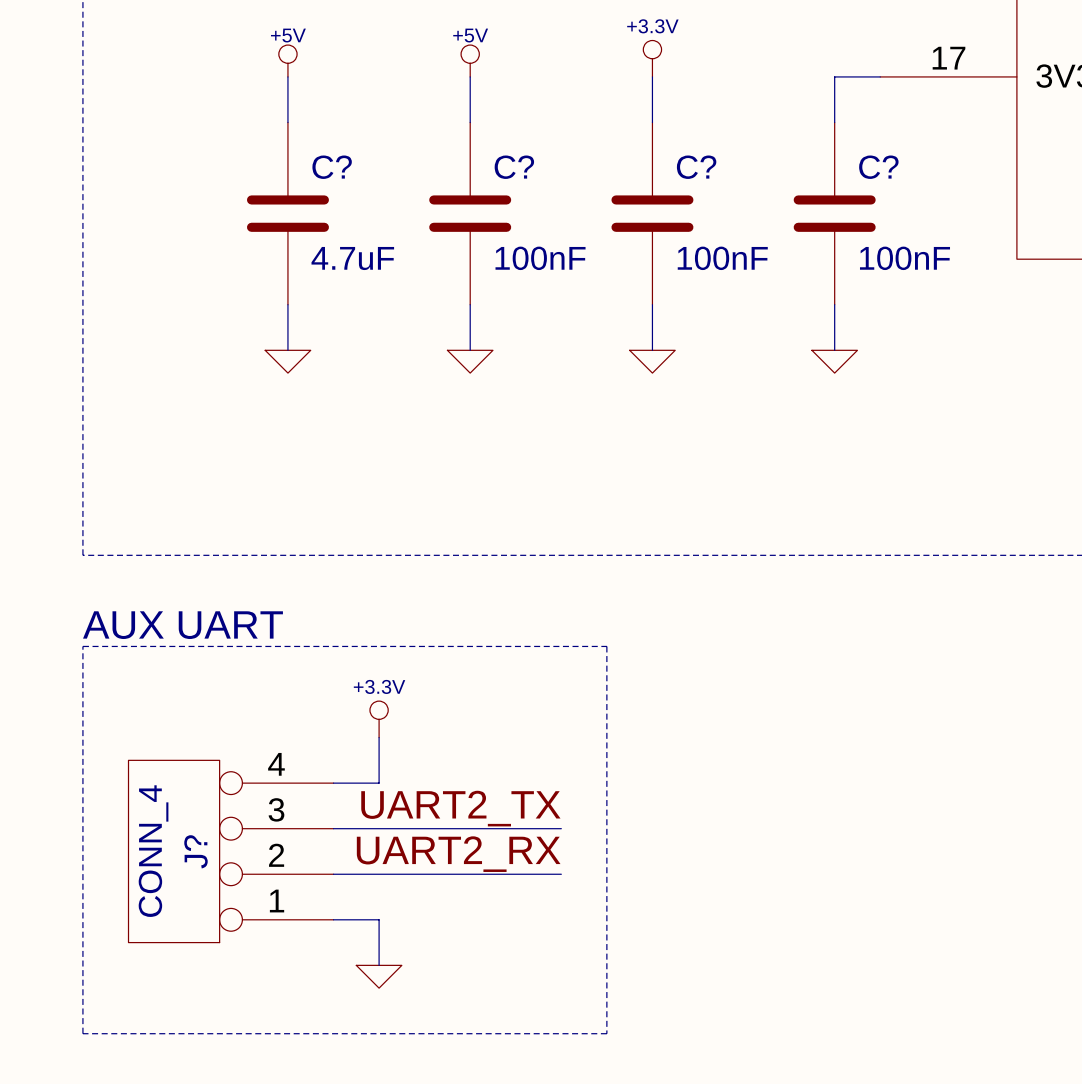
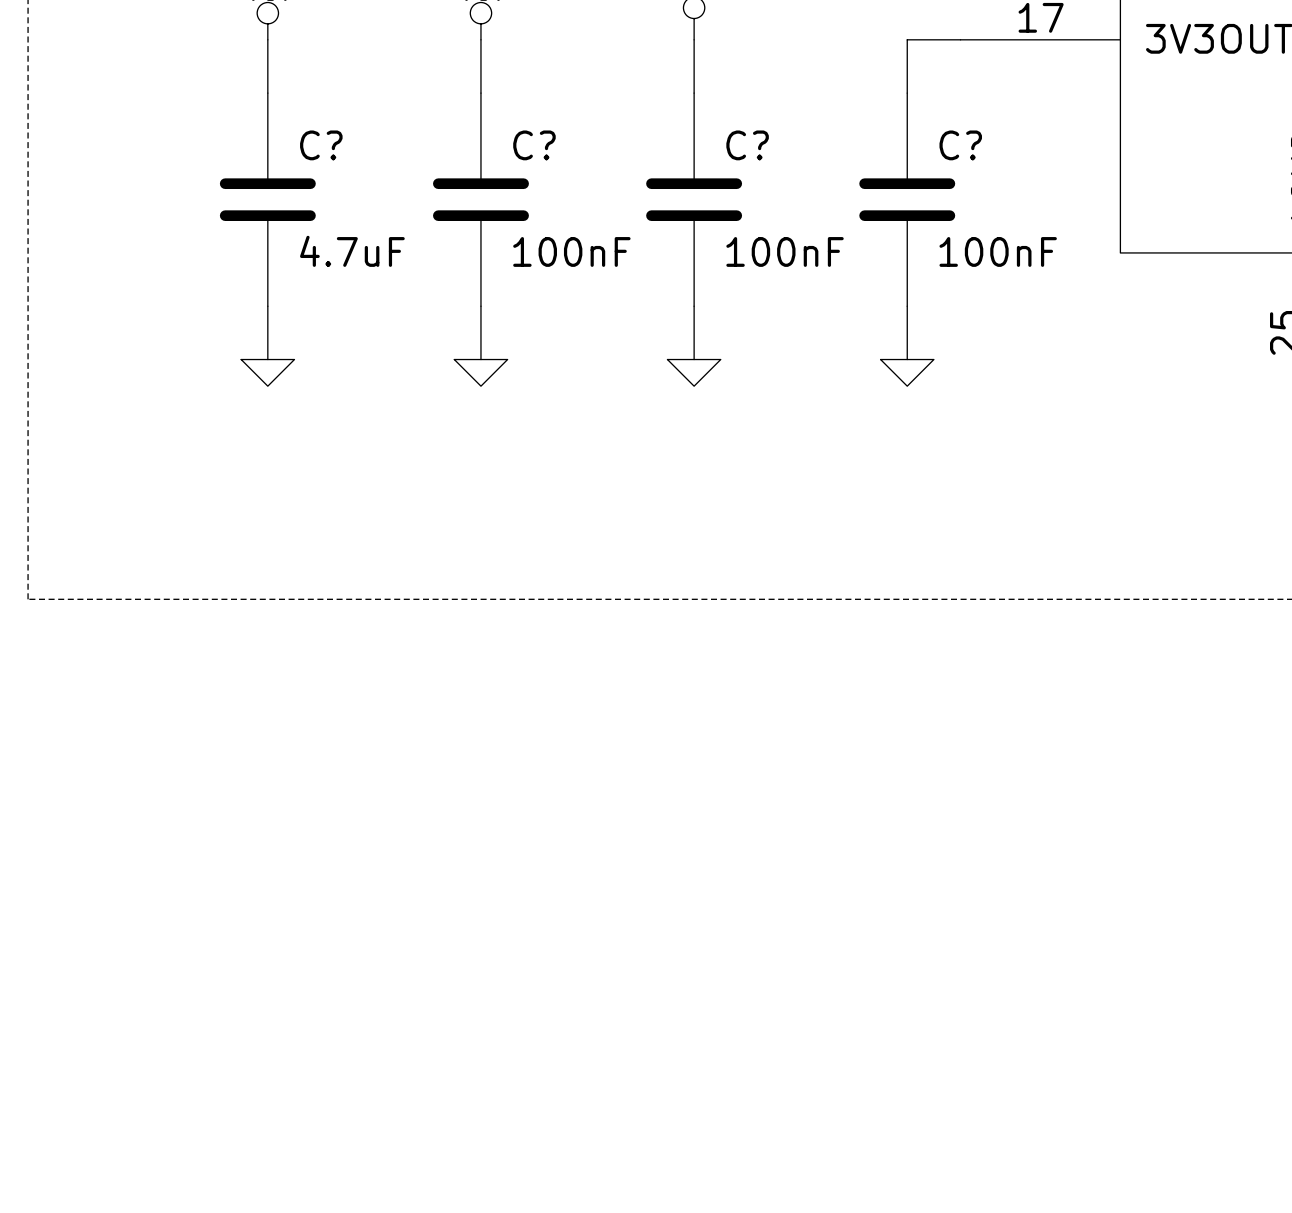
text: AUX UART (182, 625) -> none
line: (82, 646) (606, 646) (606, 1033) (82, 1033) (82, 646) -> none
power symbol: +3.3V (379, 719) -> none
wire: (379, 737) (379, 783) (333, 783) -> none
label: UART2_TX (460, 808) -> none
wire: (333, 828) (561, 828) -> none
J?: CONN_4 (231, 851) -> none
label: UART2_RX (458, 854) -> none
wire: (333, 874) (561, 874) -> none
wire: (333, 919) (379, 919) (379, 965) -> none
power symbol: (379, 976) -> none

